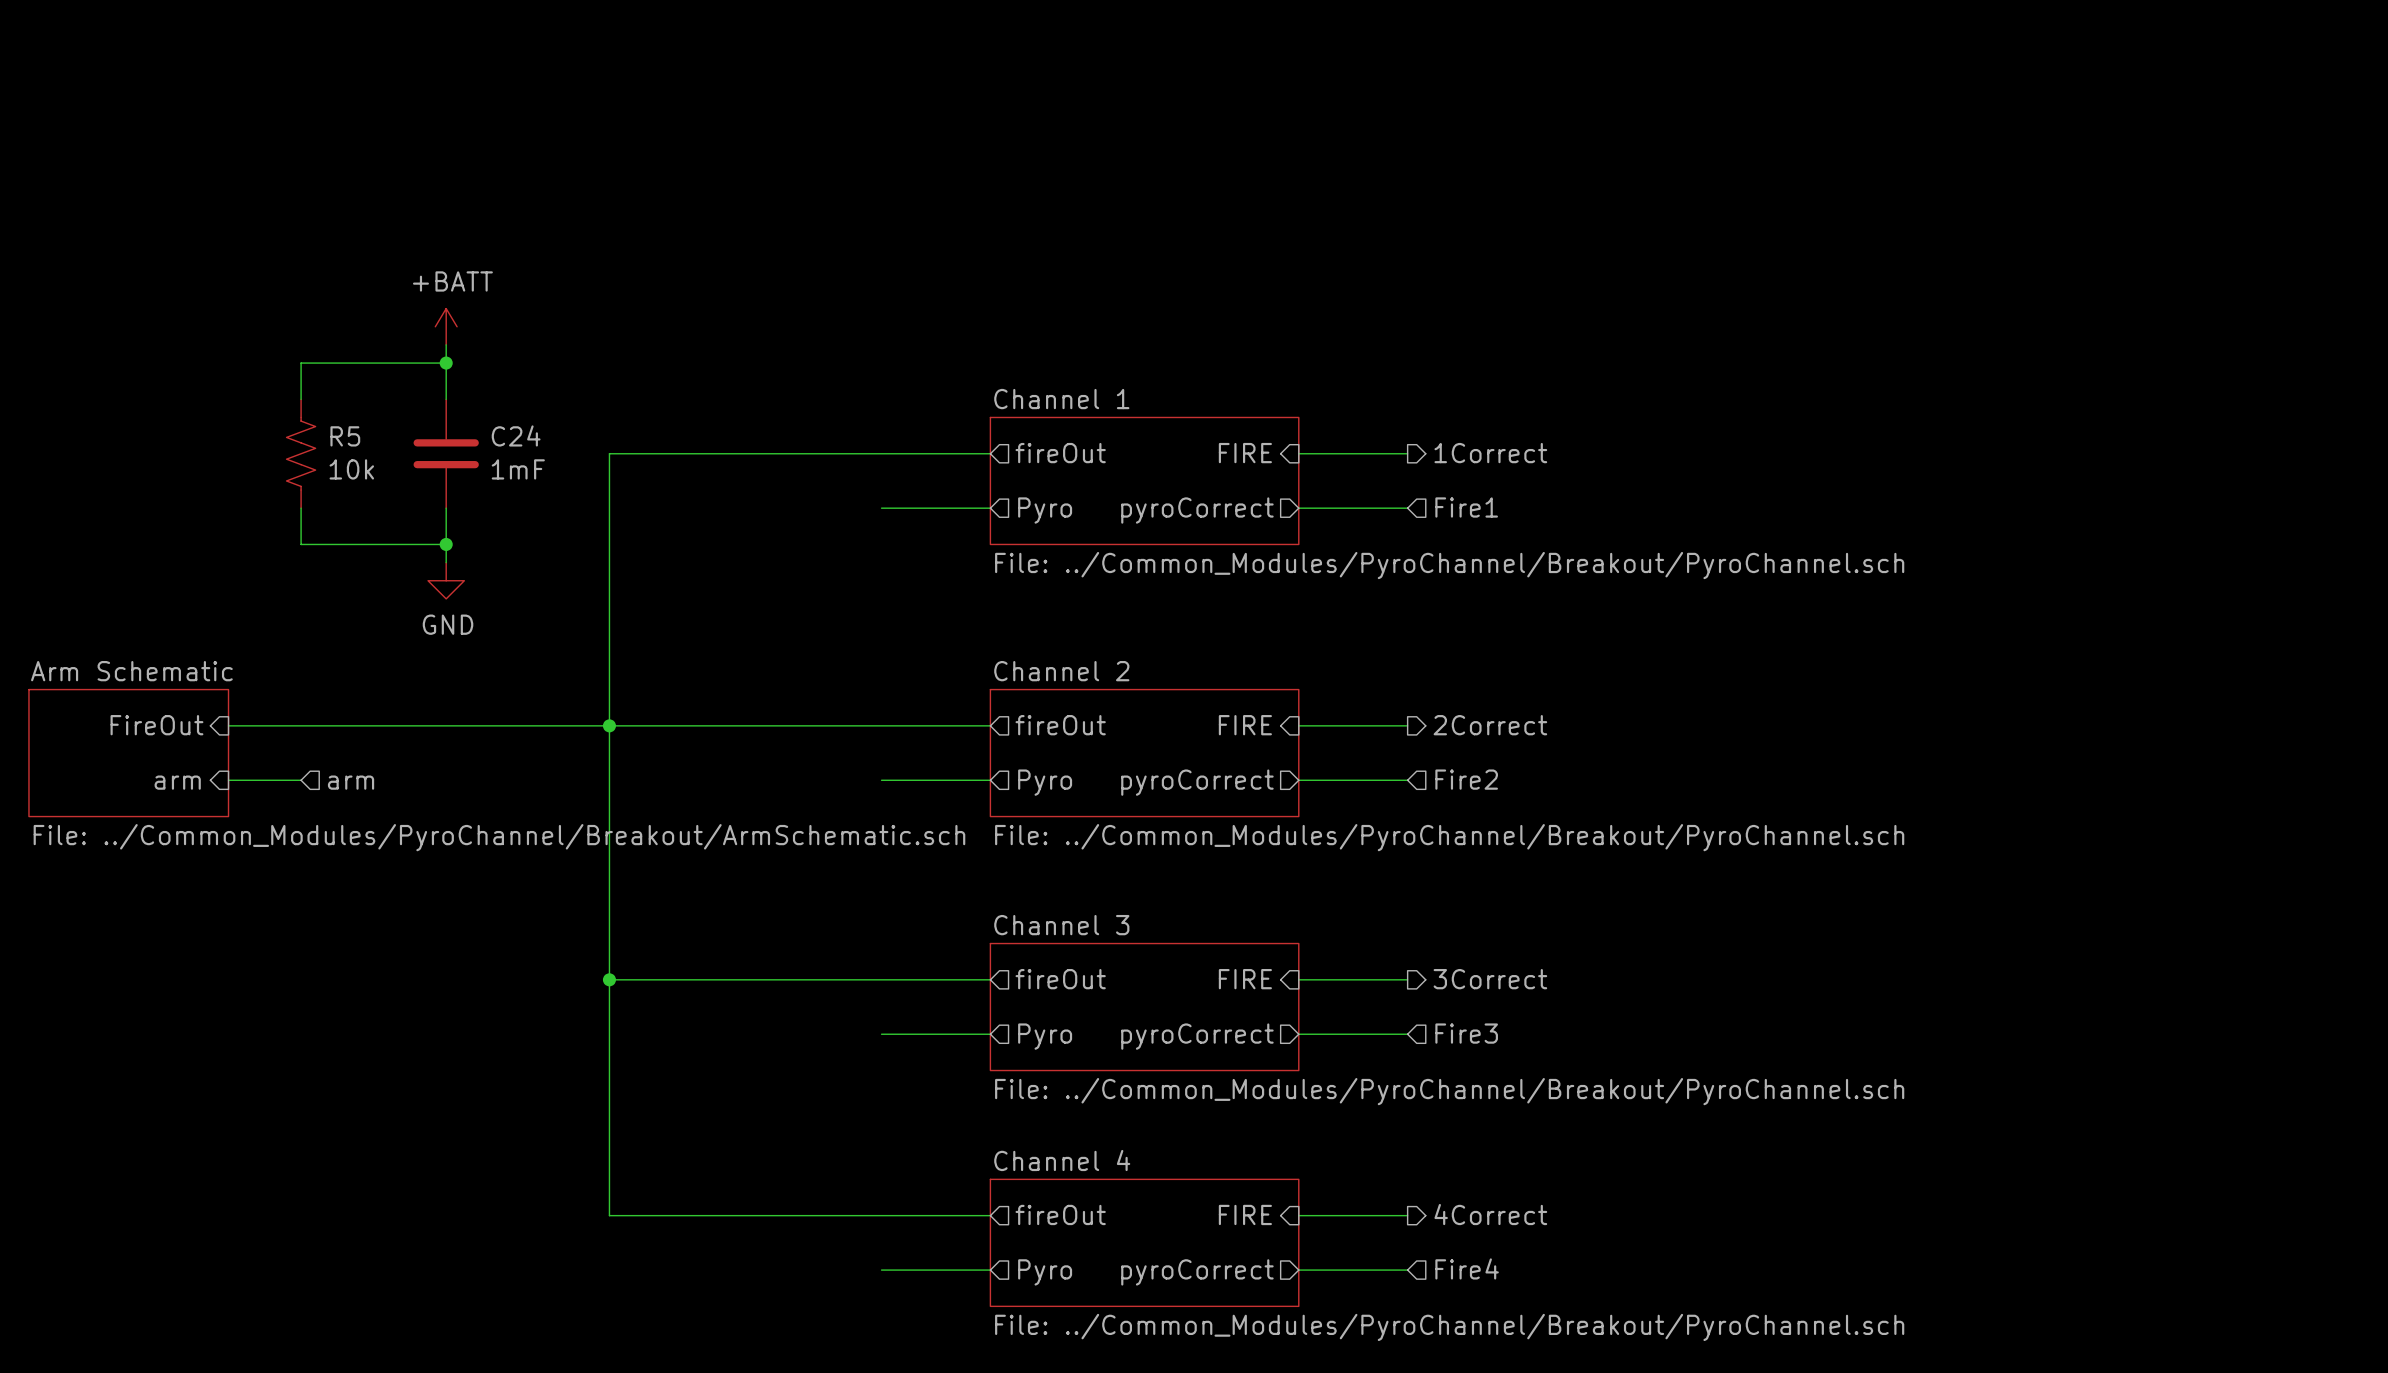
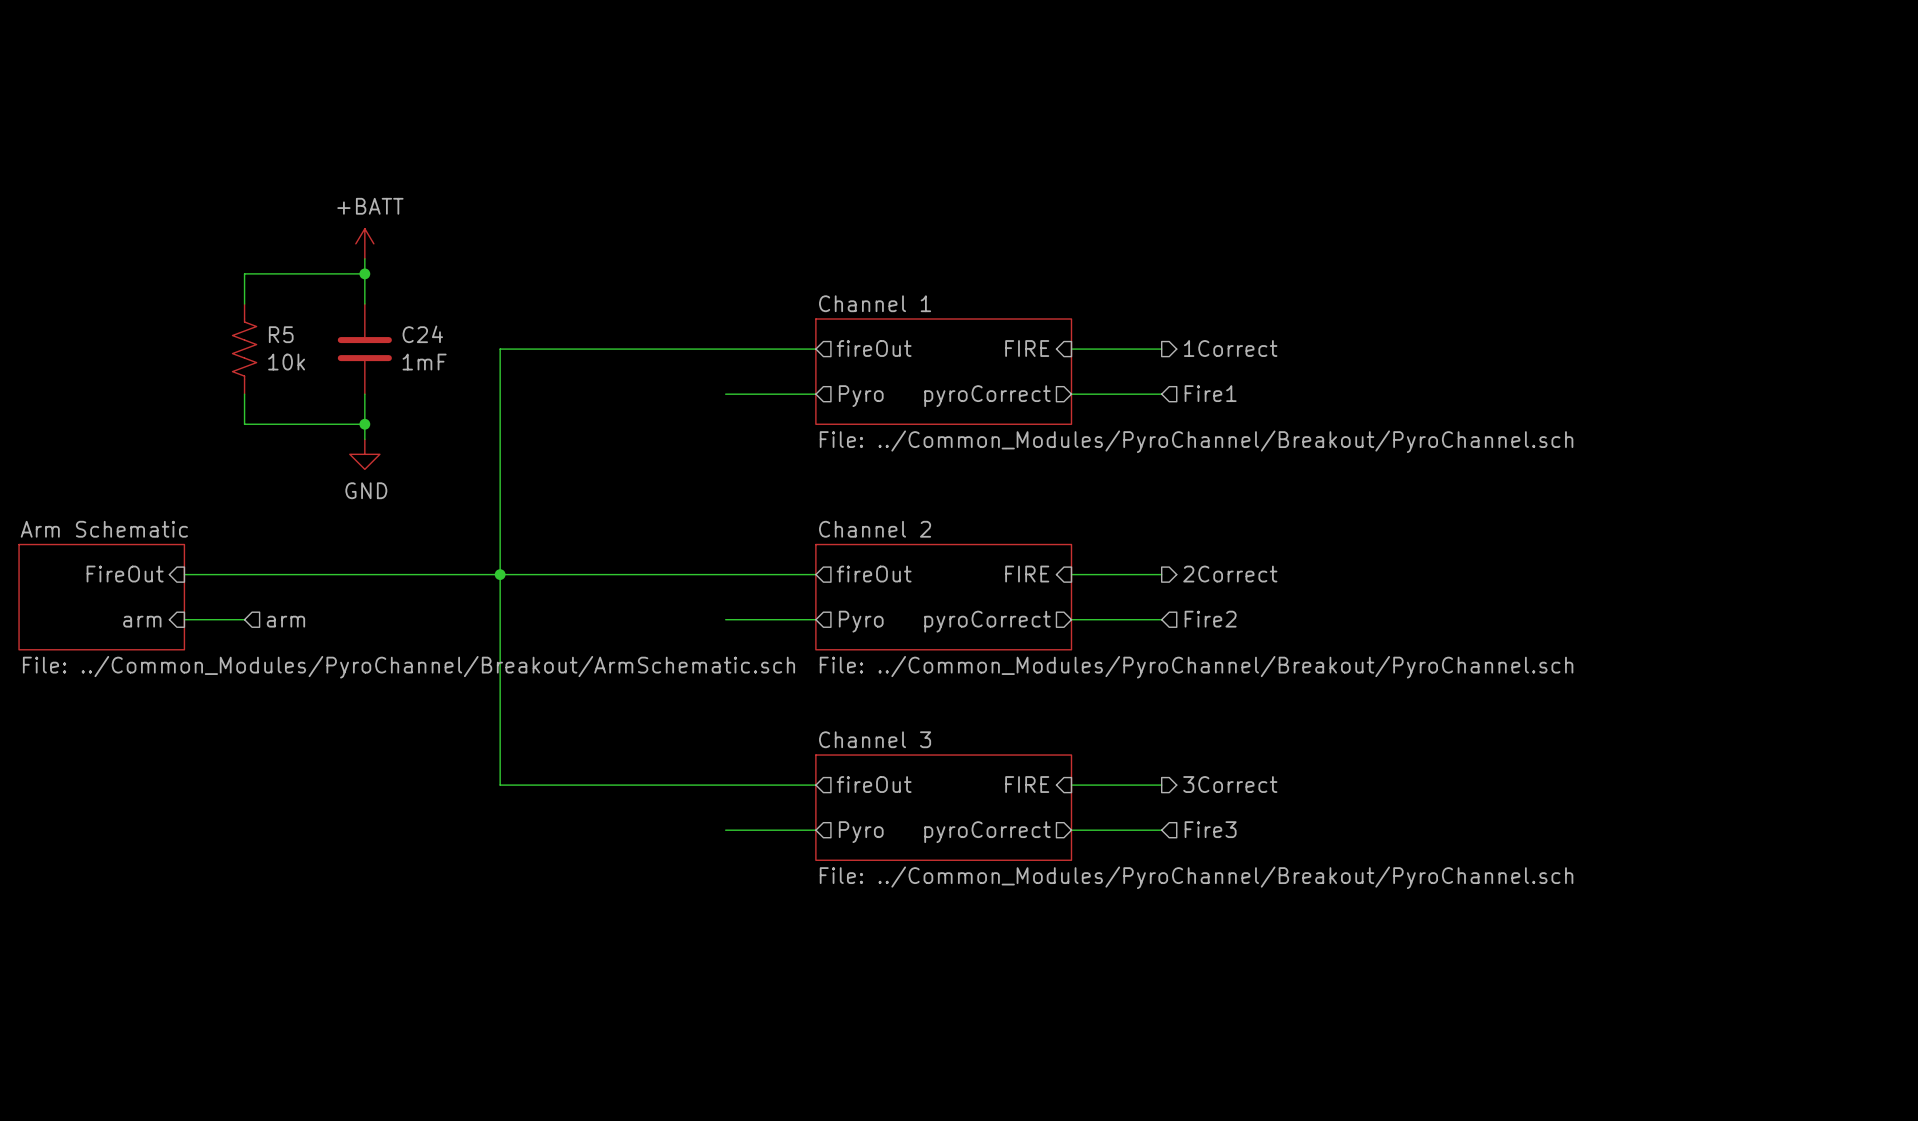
wire: (609, 979) (609, 1215) (990, 1215) -> none
junction: (609, 979) -> none
sheet pin: fireOut (1060, 1214) -> none
sheet pin: FIRE (1245, 1214) -> none
hierarchical label: 4Correct (1490, 1214) -> none
wire: (1298, 1215) (1407, 1215) -> none
sheet Channel 4: File: ../Common_Modules/PyroChannel/Breakout/PyroChannel.sch (1144, 1242) -> none
hierarchical label: Fire4 (1467, 1268) -> none
wire: (881, 1270) (990, 1270) -> none
wire: (1298, 1270) (1407, 1270) -> none
sheet pin: Pyro (1045, 1272) -> none
sheet pin: pyroCorrect (1197, 1272) -> none

